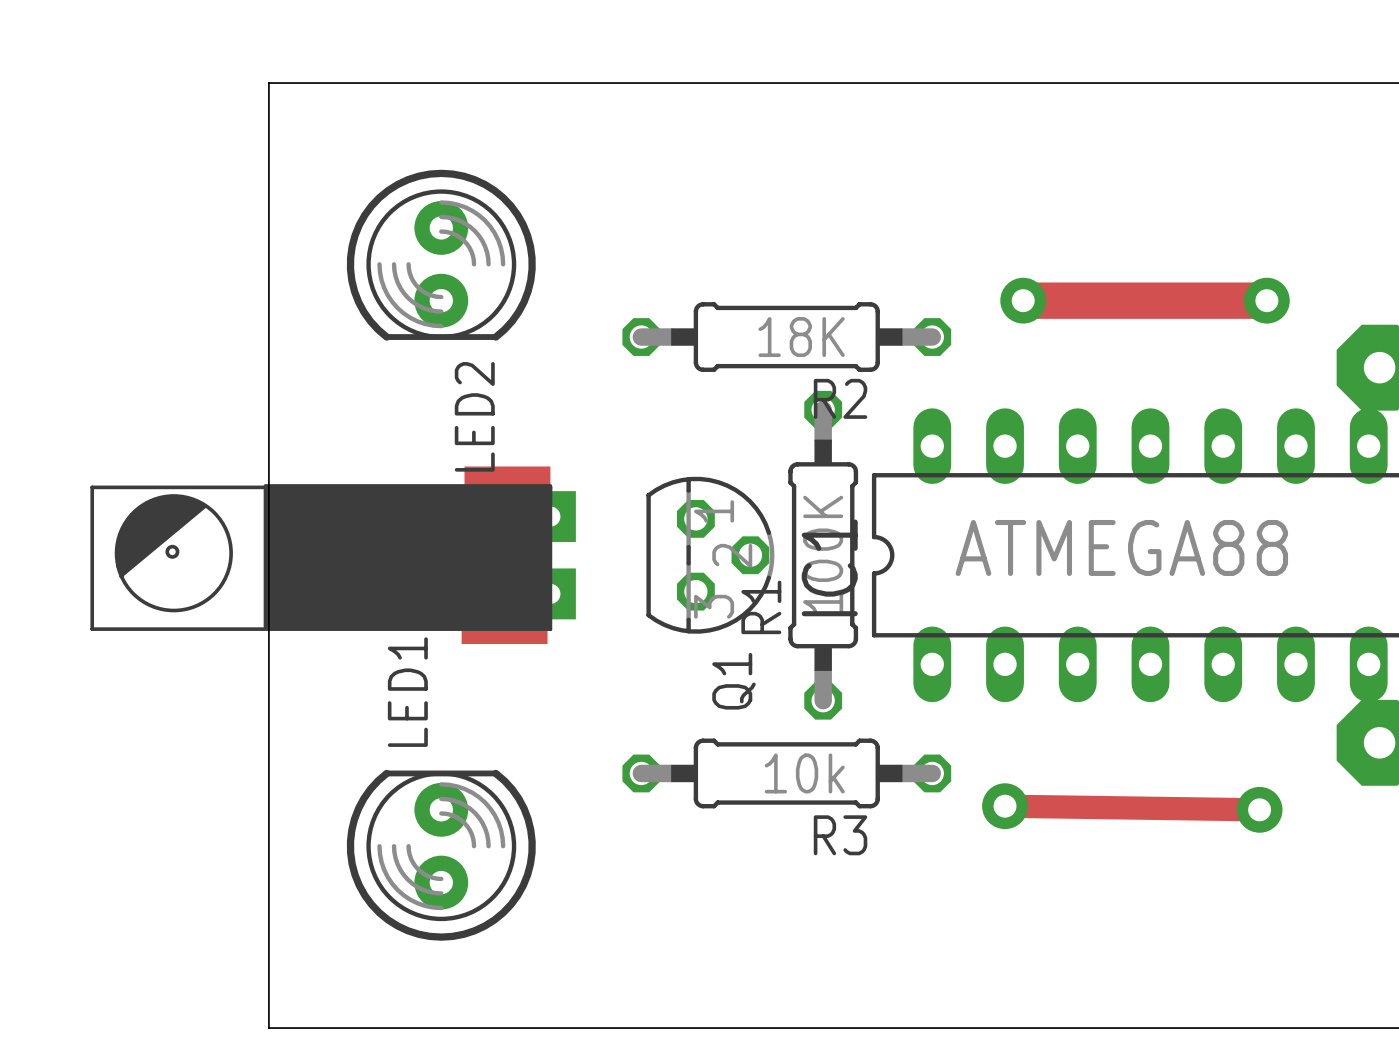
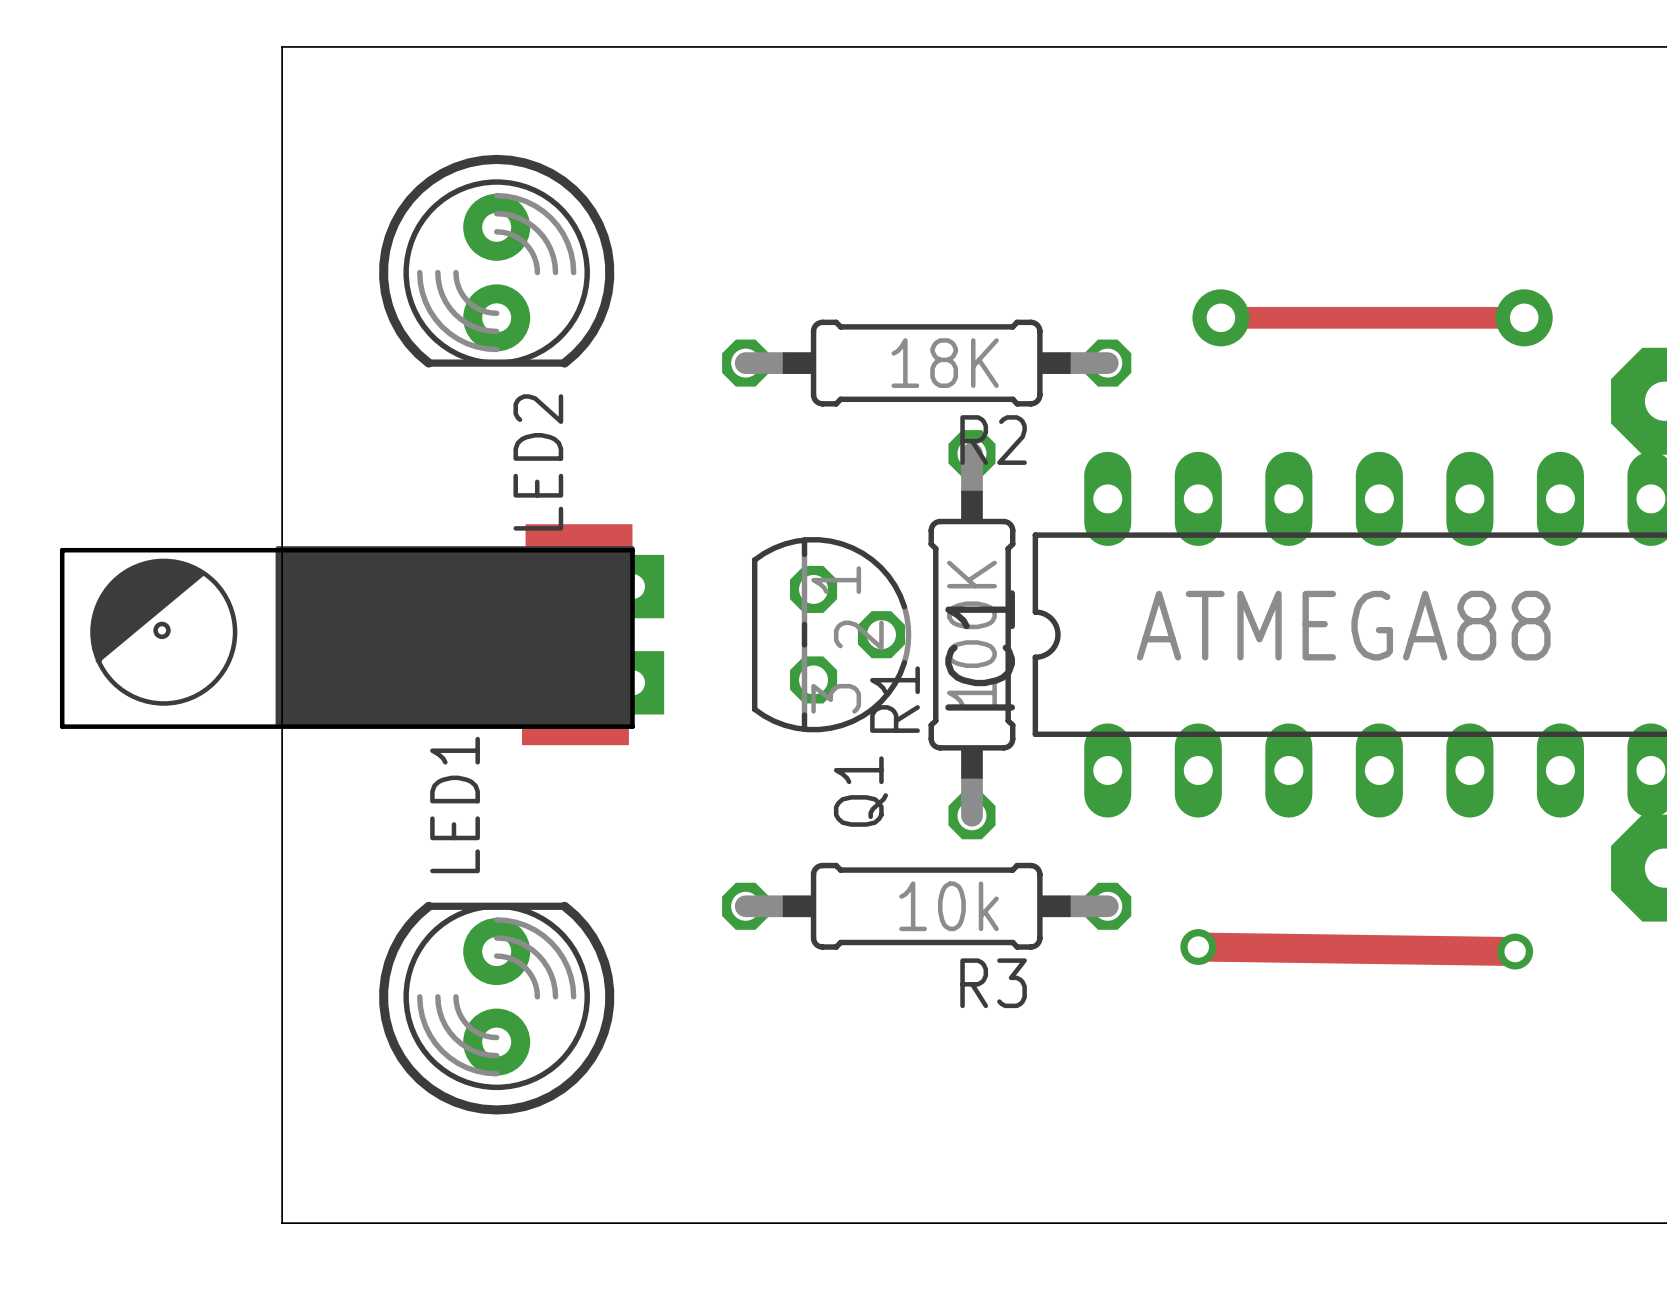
track width: thick (1023, 300) (1266, 300) -> thin (1220, 317) (1524, 317)
part footprint: [90, 466, 576, 645] -> [59, 524, 665, 746]
via size: [982, 783, 1028, 830] -> [1180, 929, 1217, 965]
via size: [1236, 786, 1283, 833] -> [1497, 933, 1534, 970]

